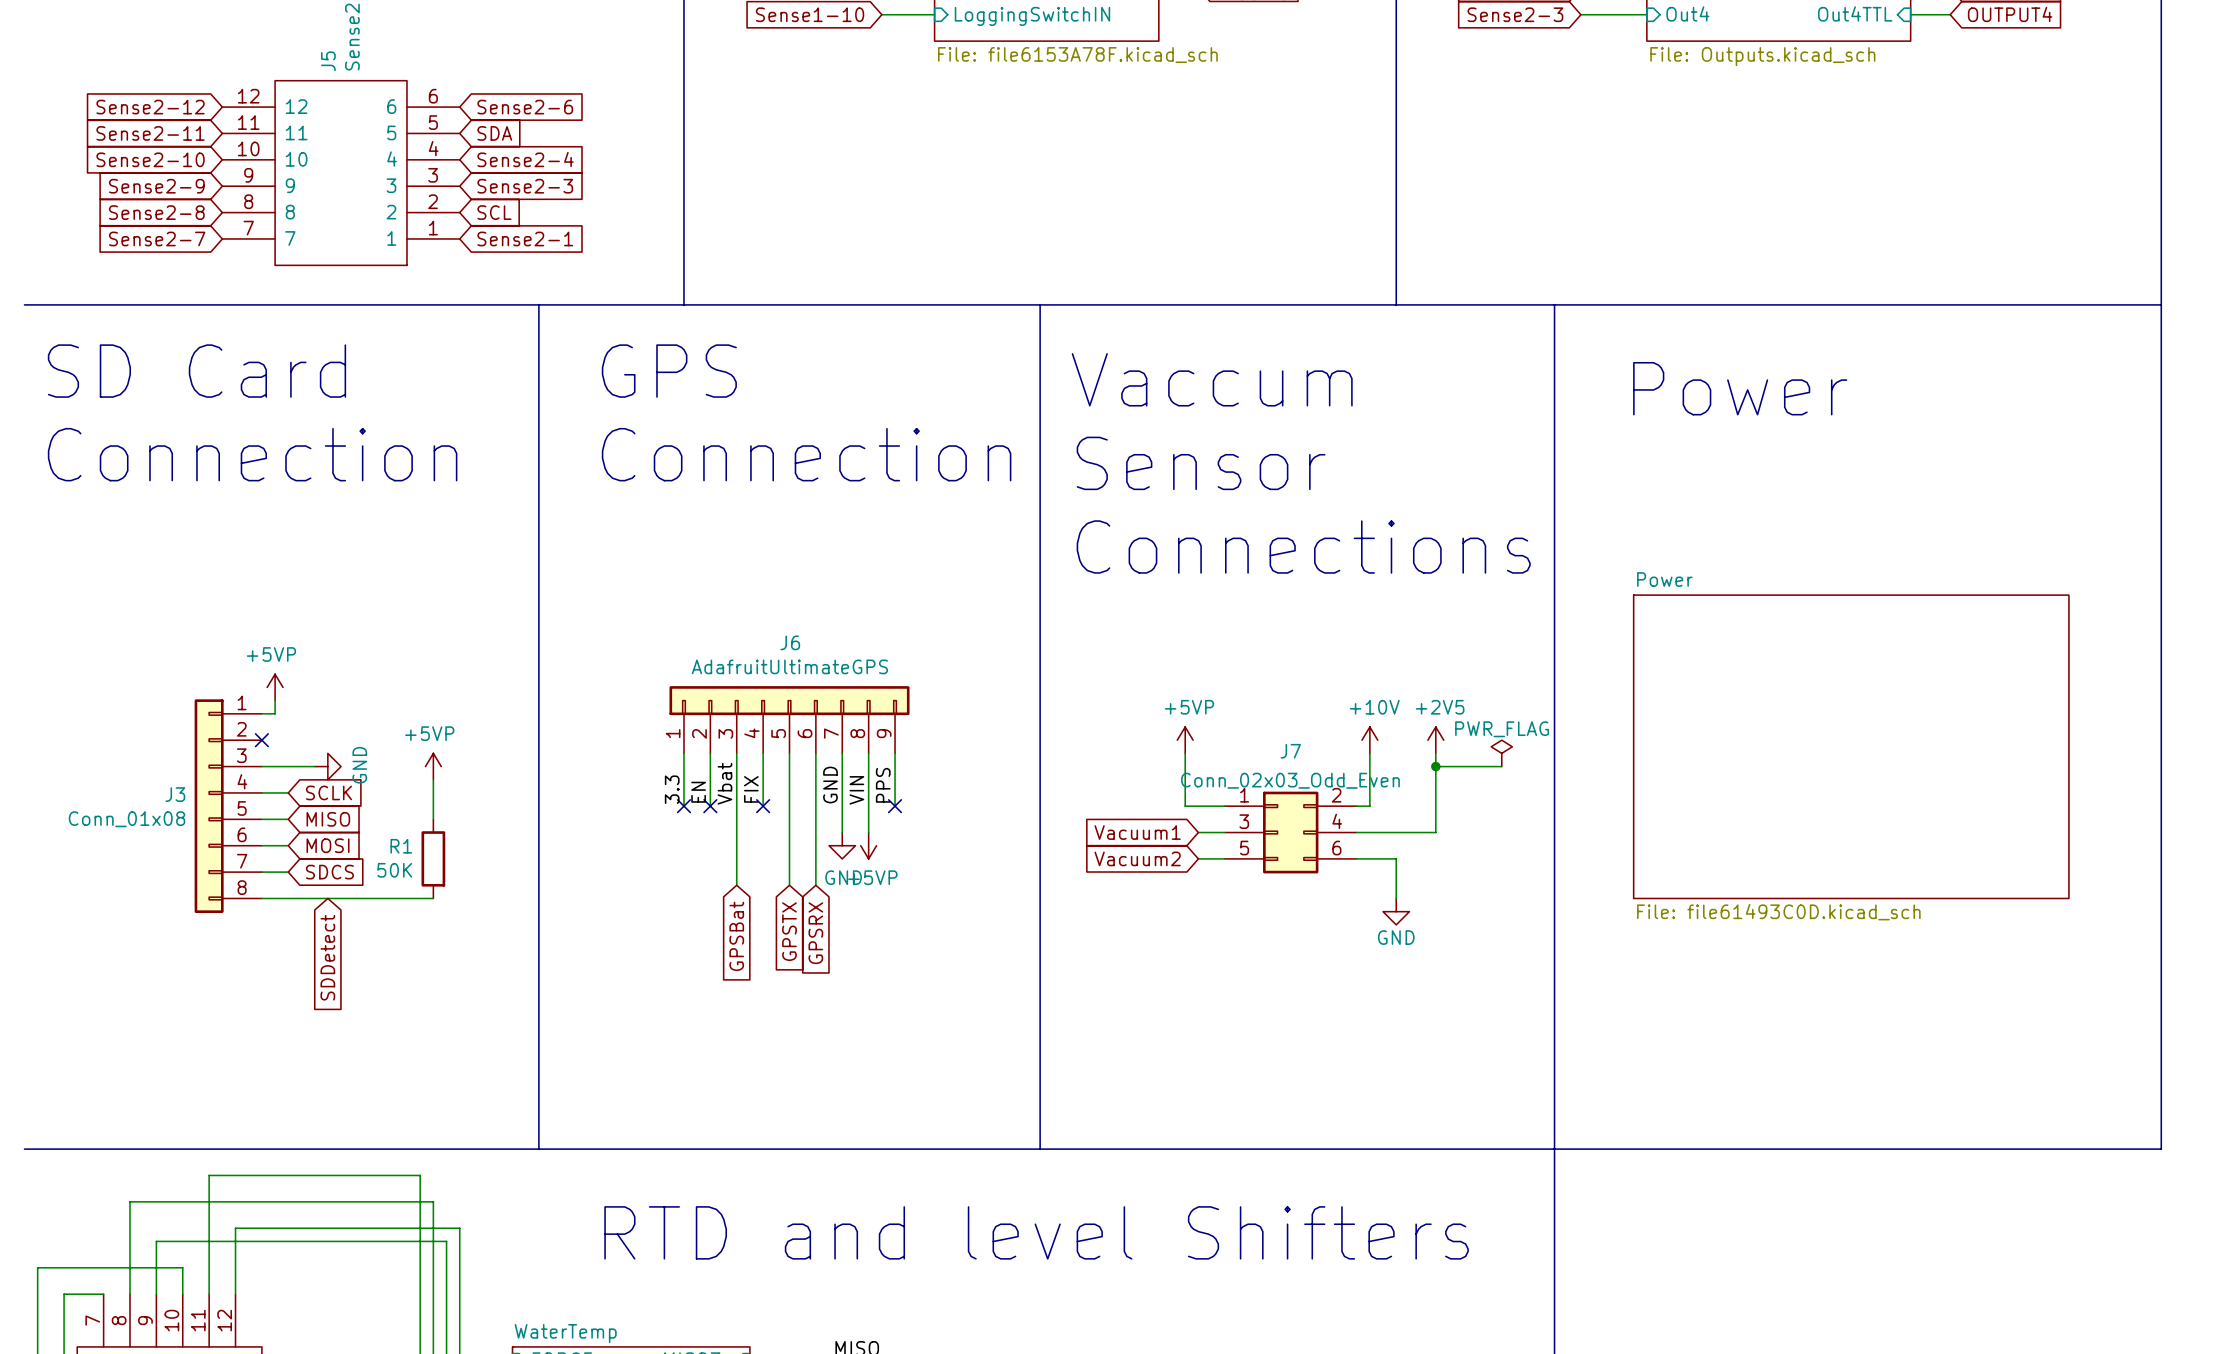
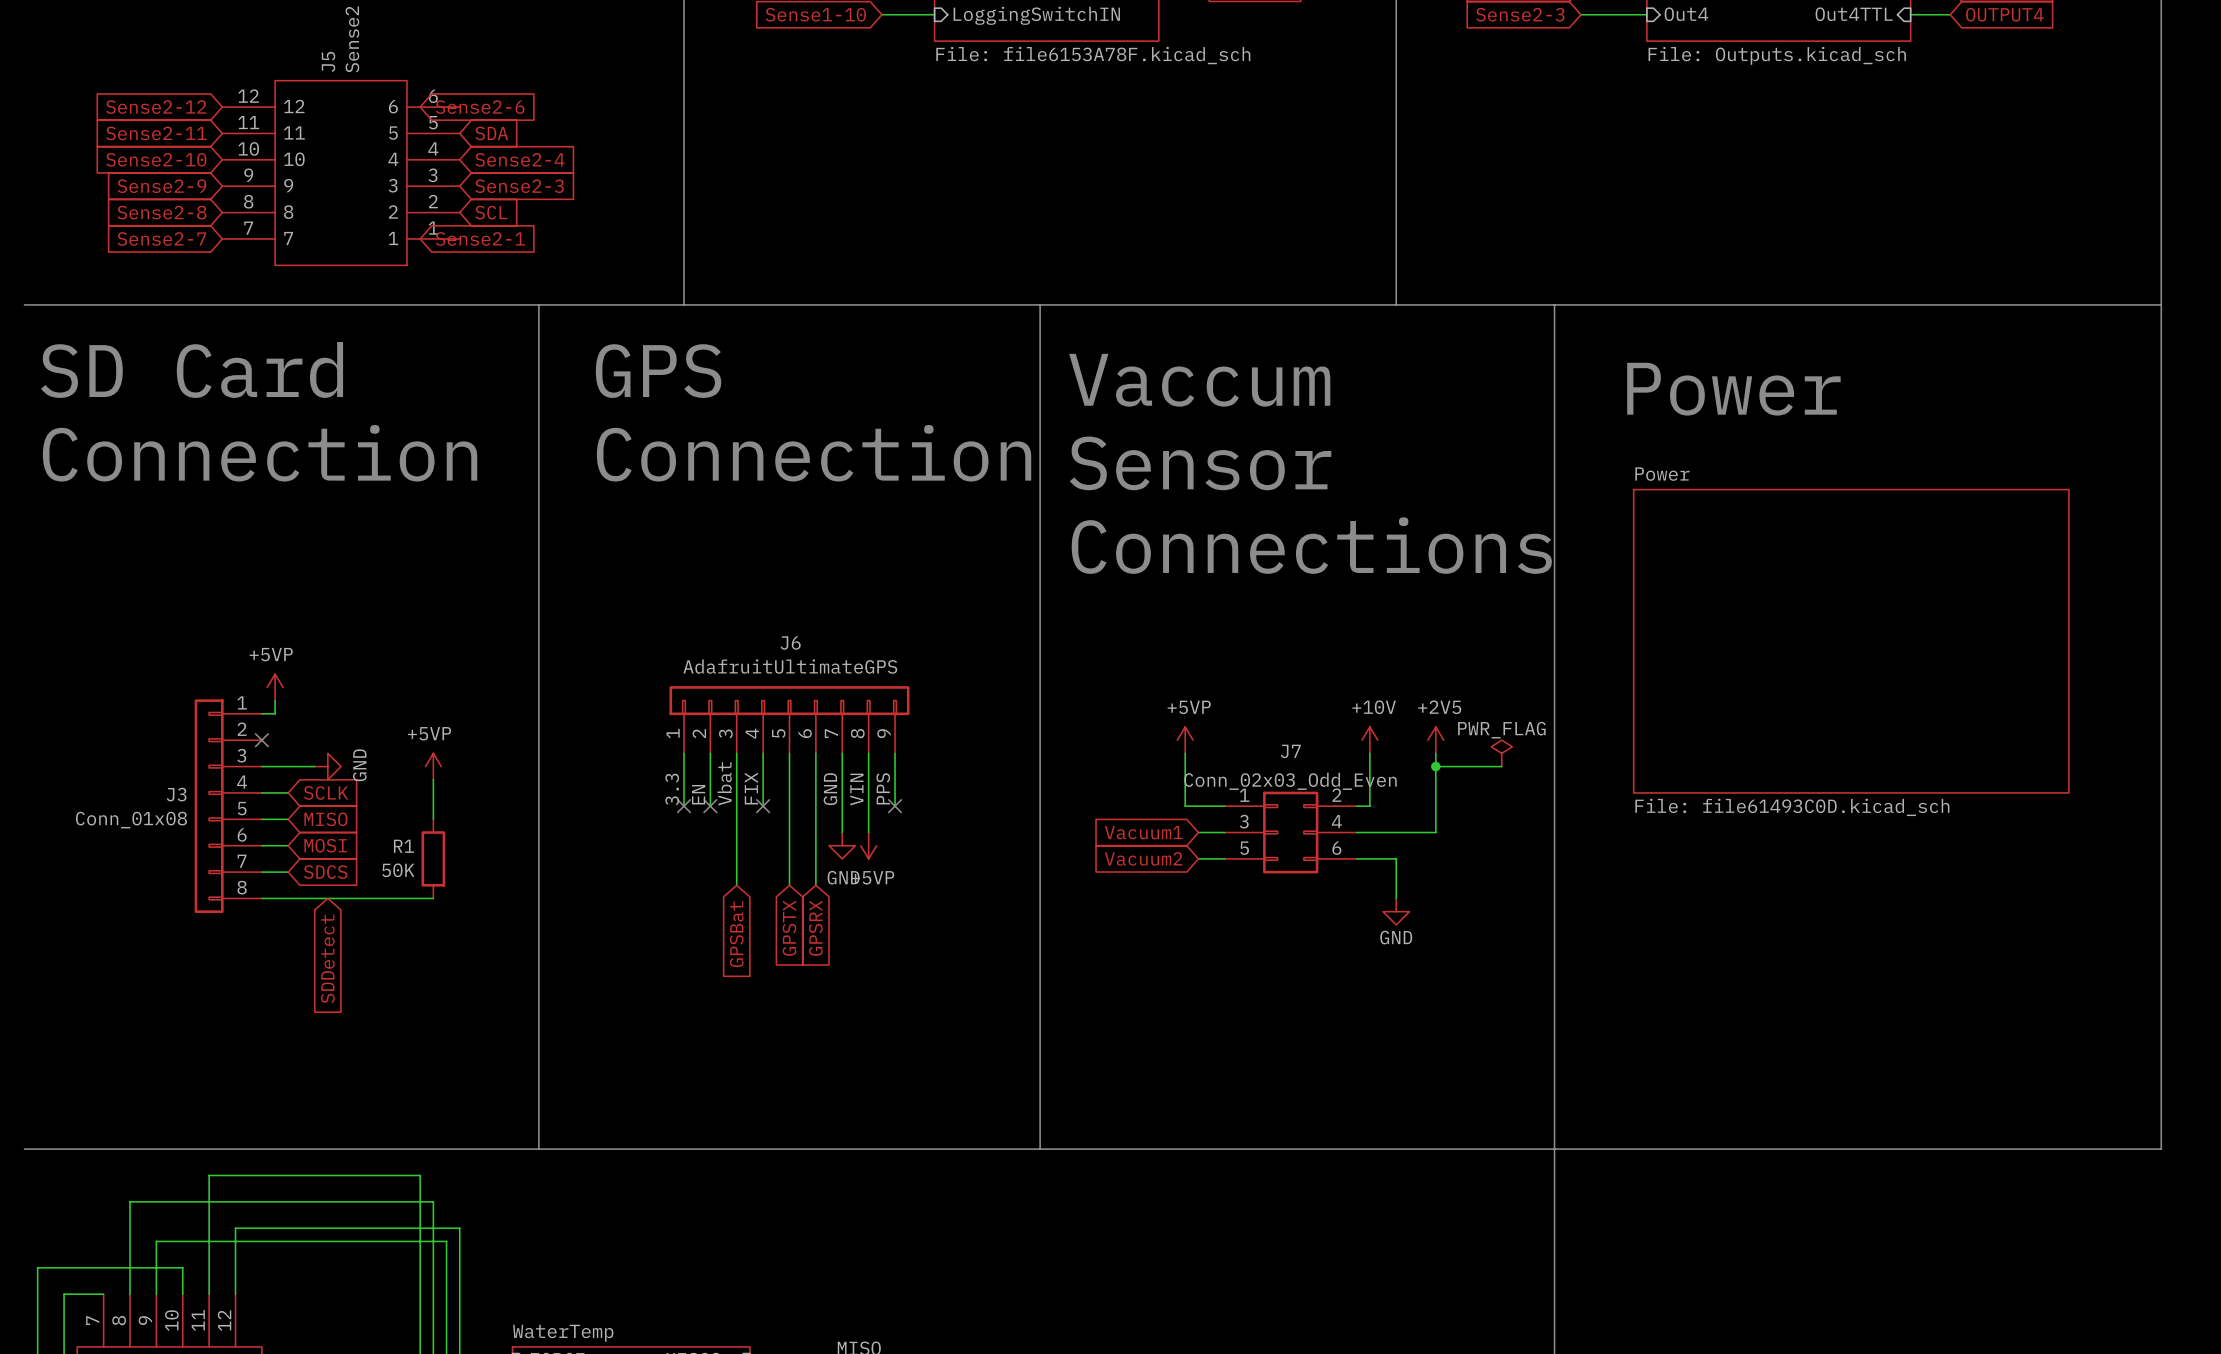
global label position: Sense2-6 (525, 107) -> Sense2-6 (480, 107)
global label position: Sense2-1 (525, 238) -> Sense2-1 (480, 238)
sheet Power position: (1851, 746) -> (1851, 641)
text: RTD and level Shifters (1036, 1232) -> none

